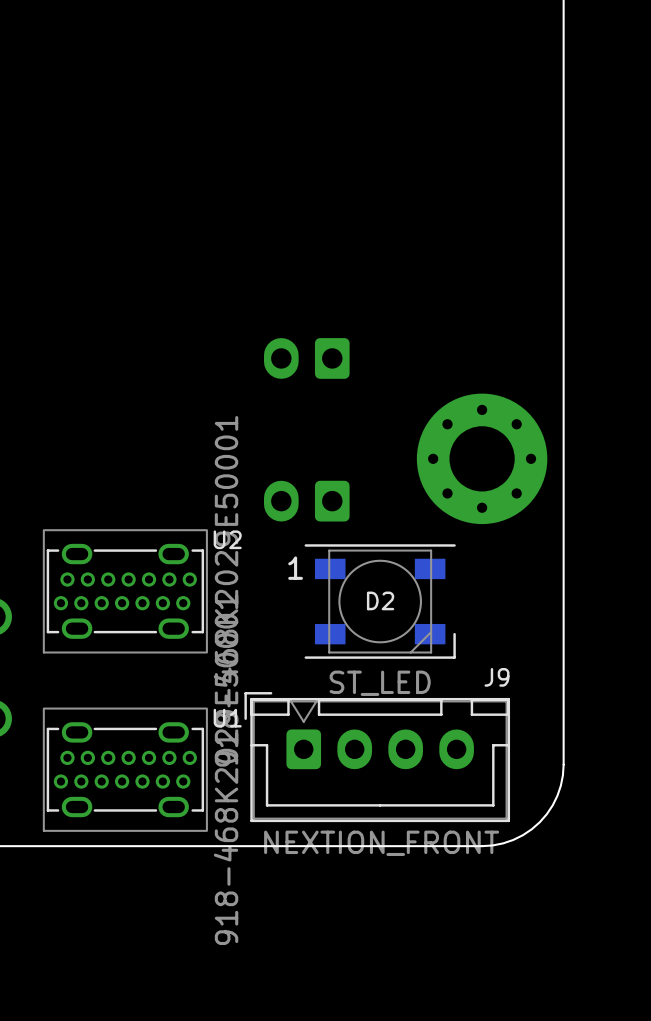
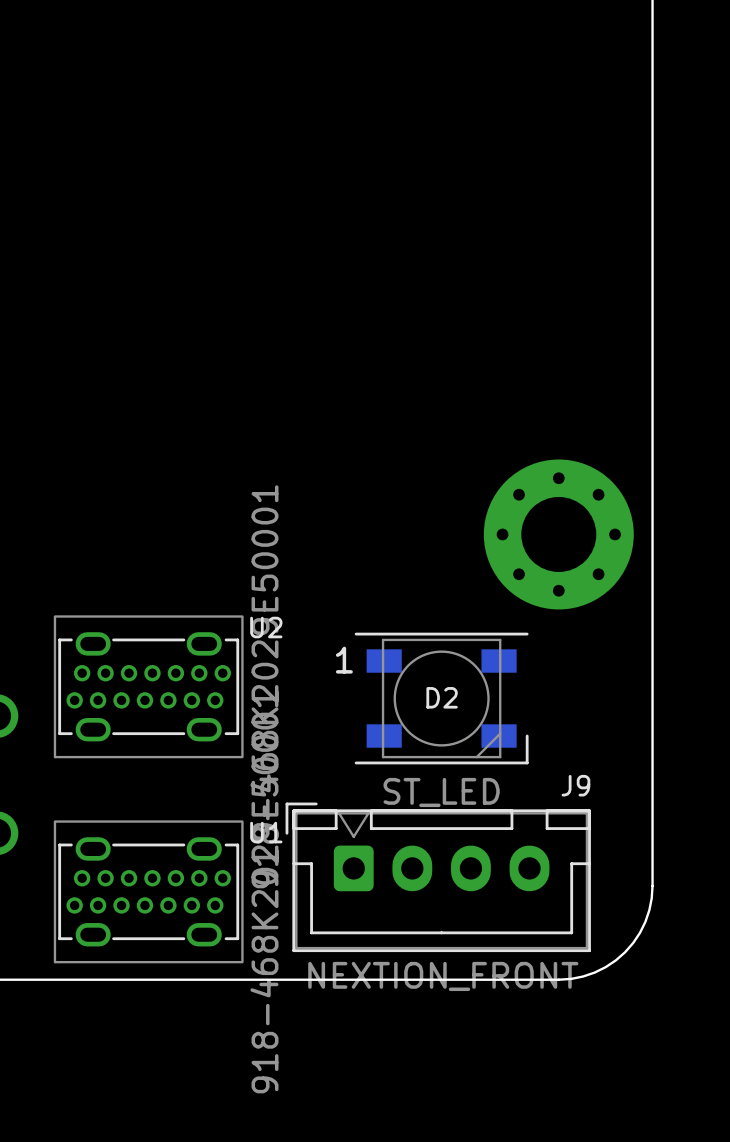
part: (306, 358) -> none
part: (306, 501) -> none

